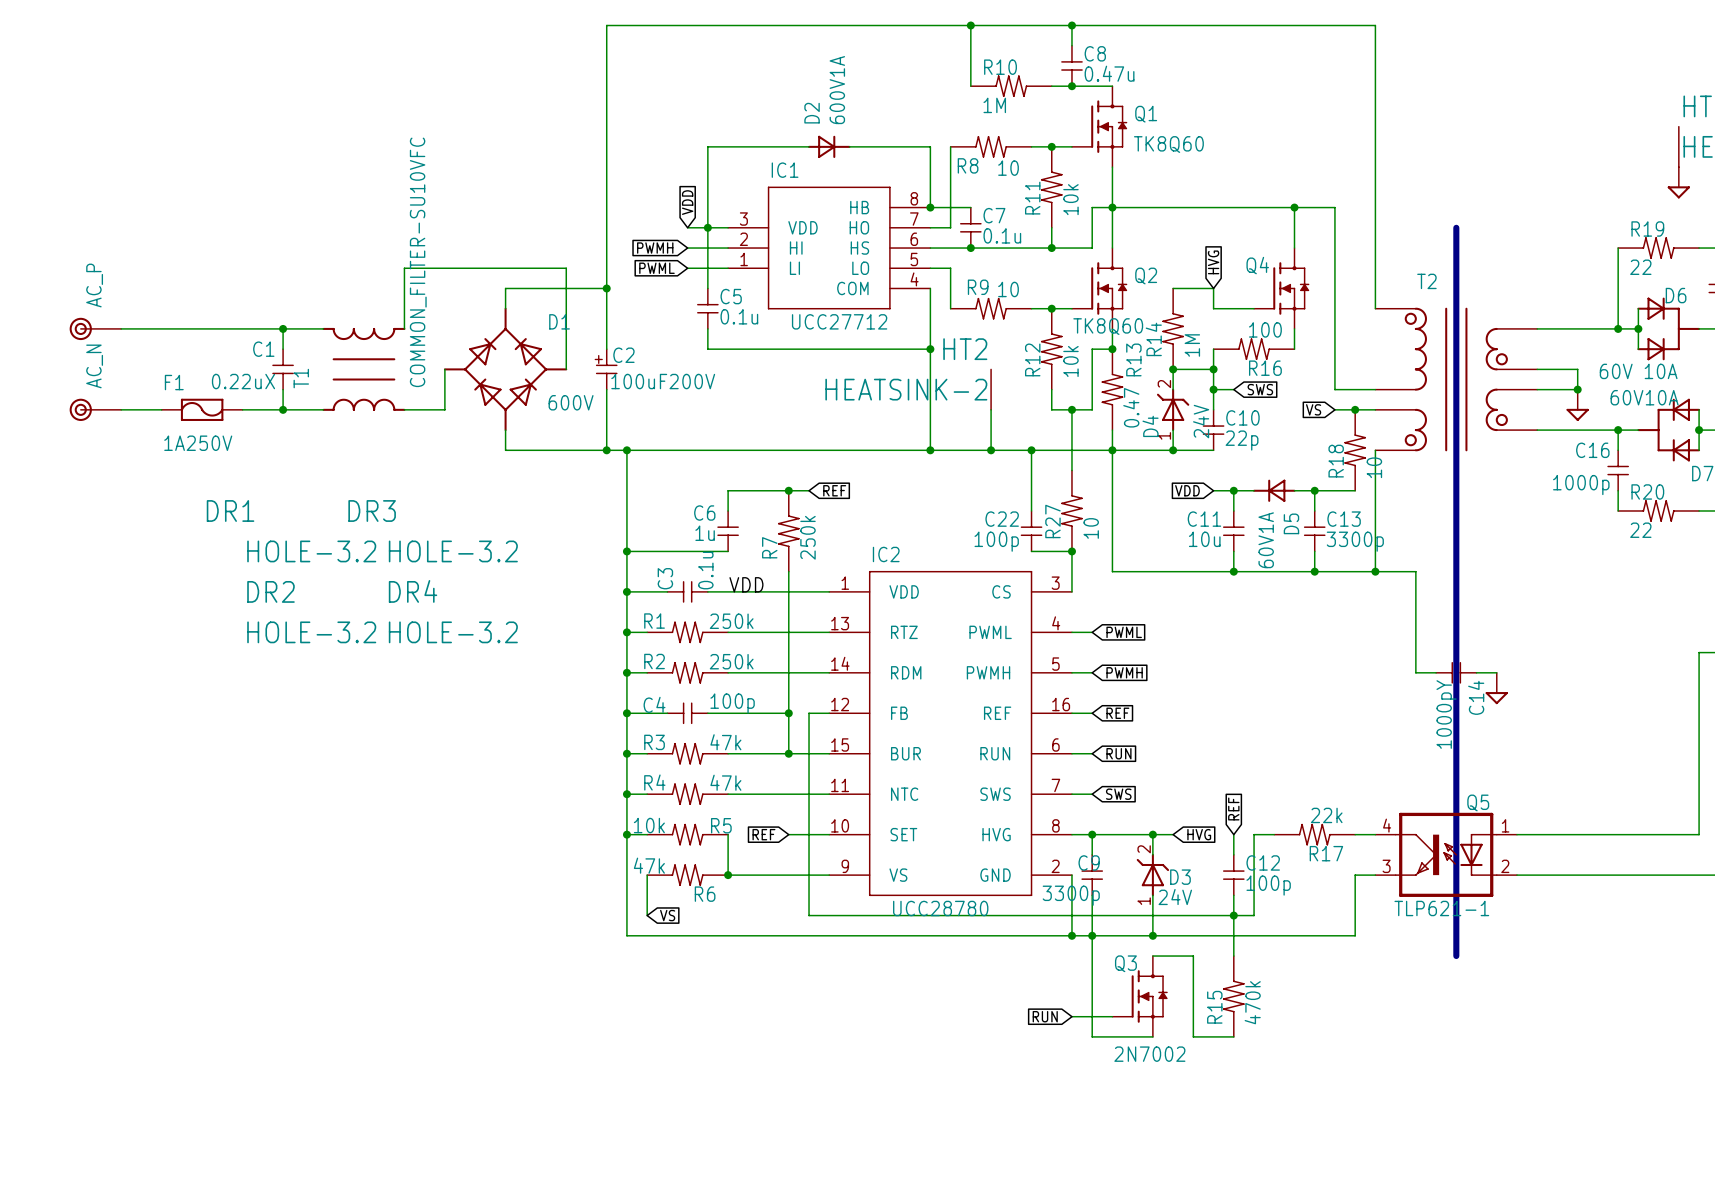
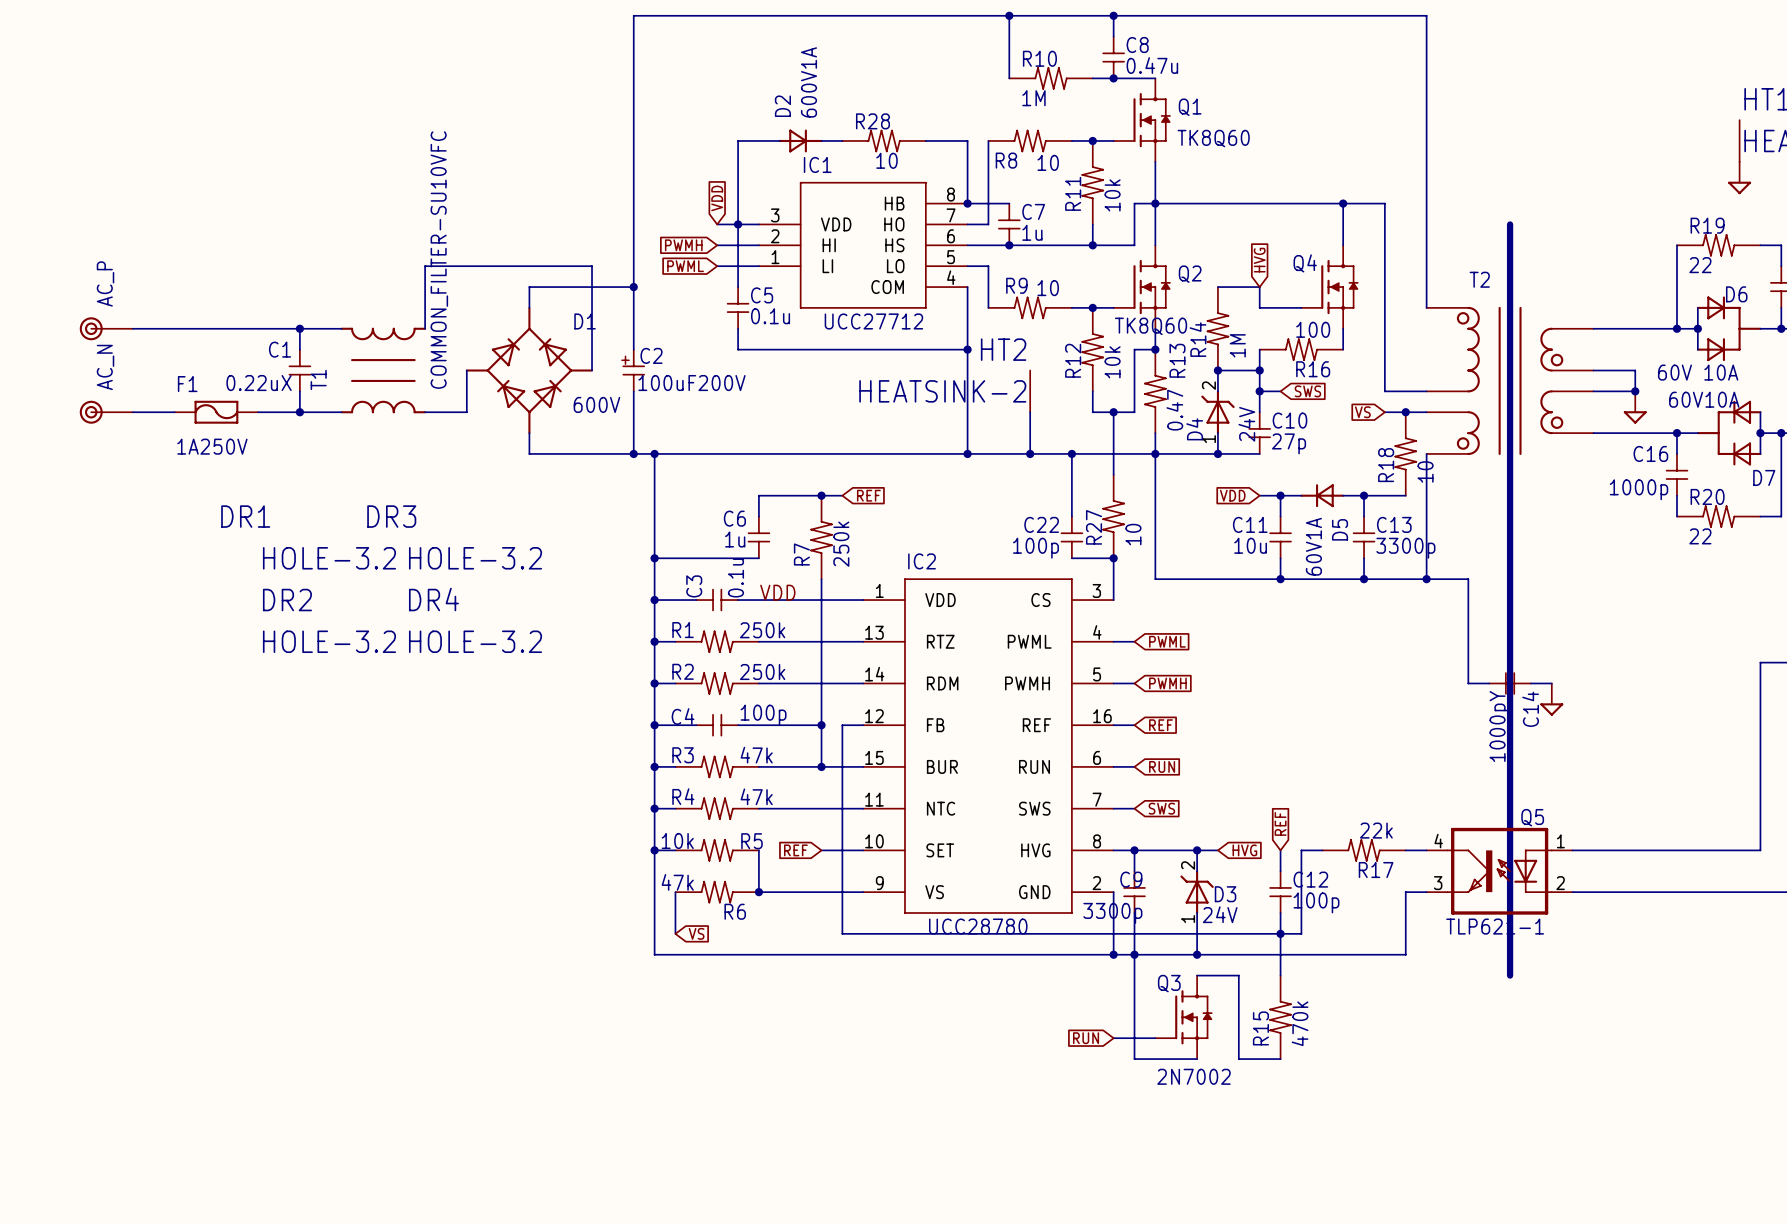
D2 position: (829, 146) -> (800, 140)
R28: none -> 10 (884, 140)
C7 value: 0.1u (1002, 235) -> 1u (1032, 232)
C10 value: 22p (1242, 440) -> 27p (1289, 443)

